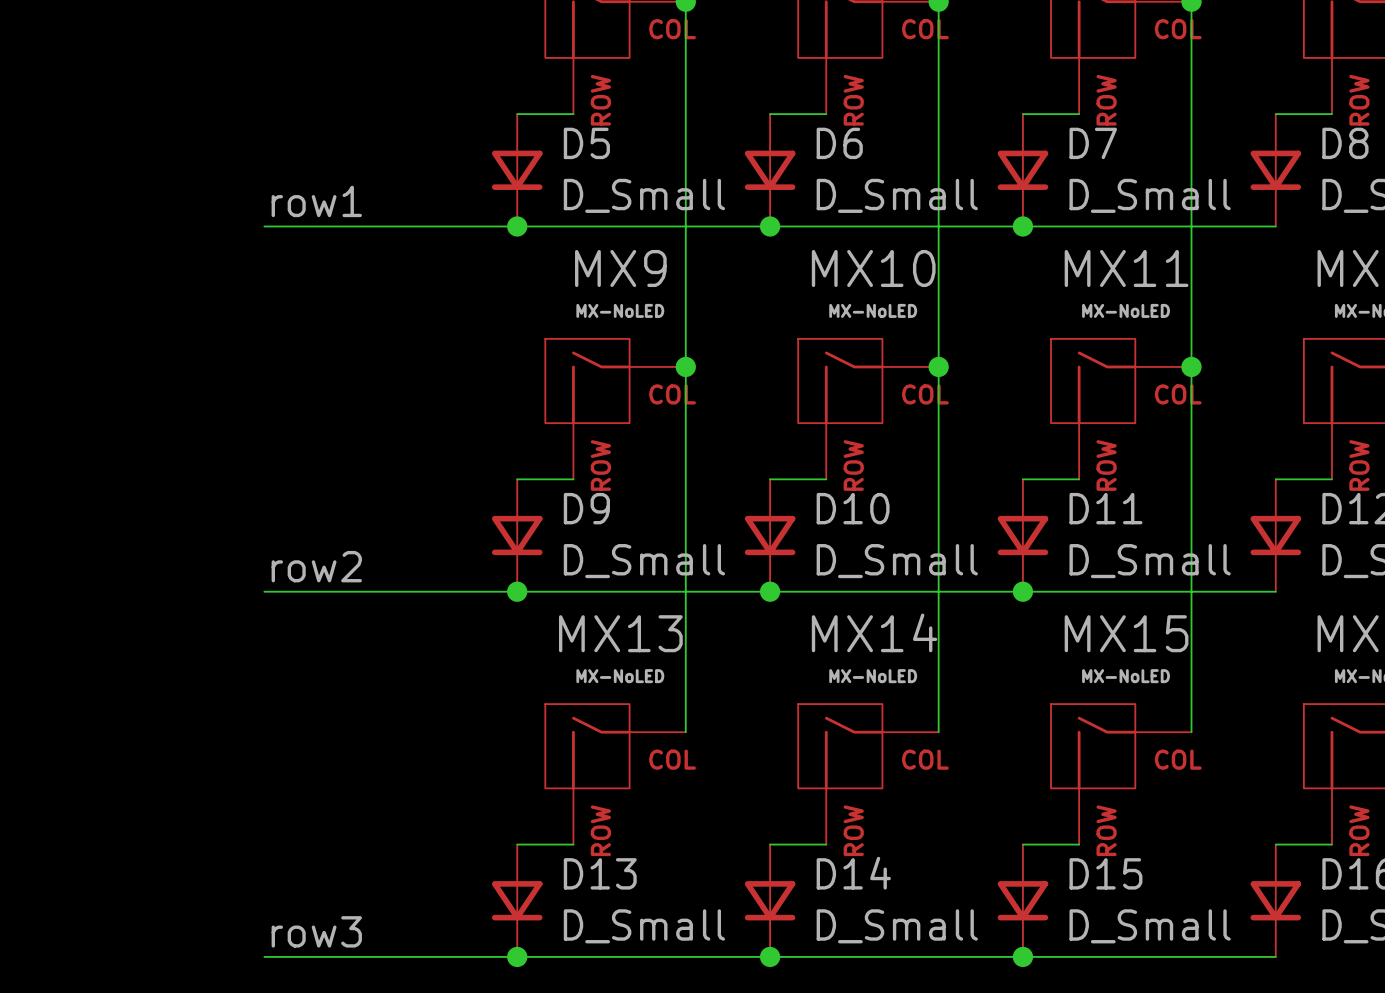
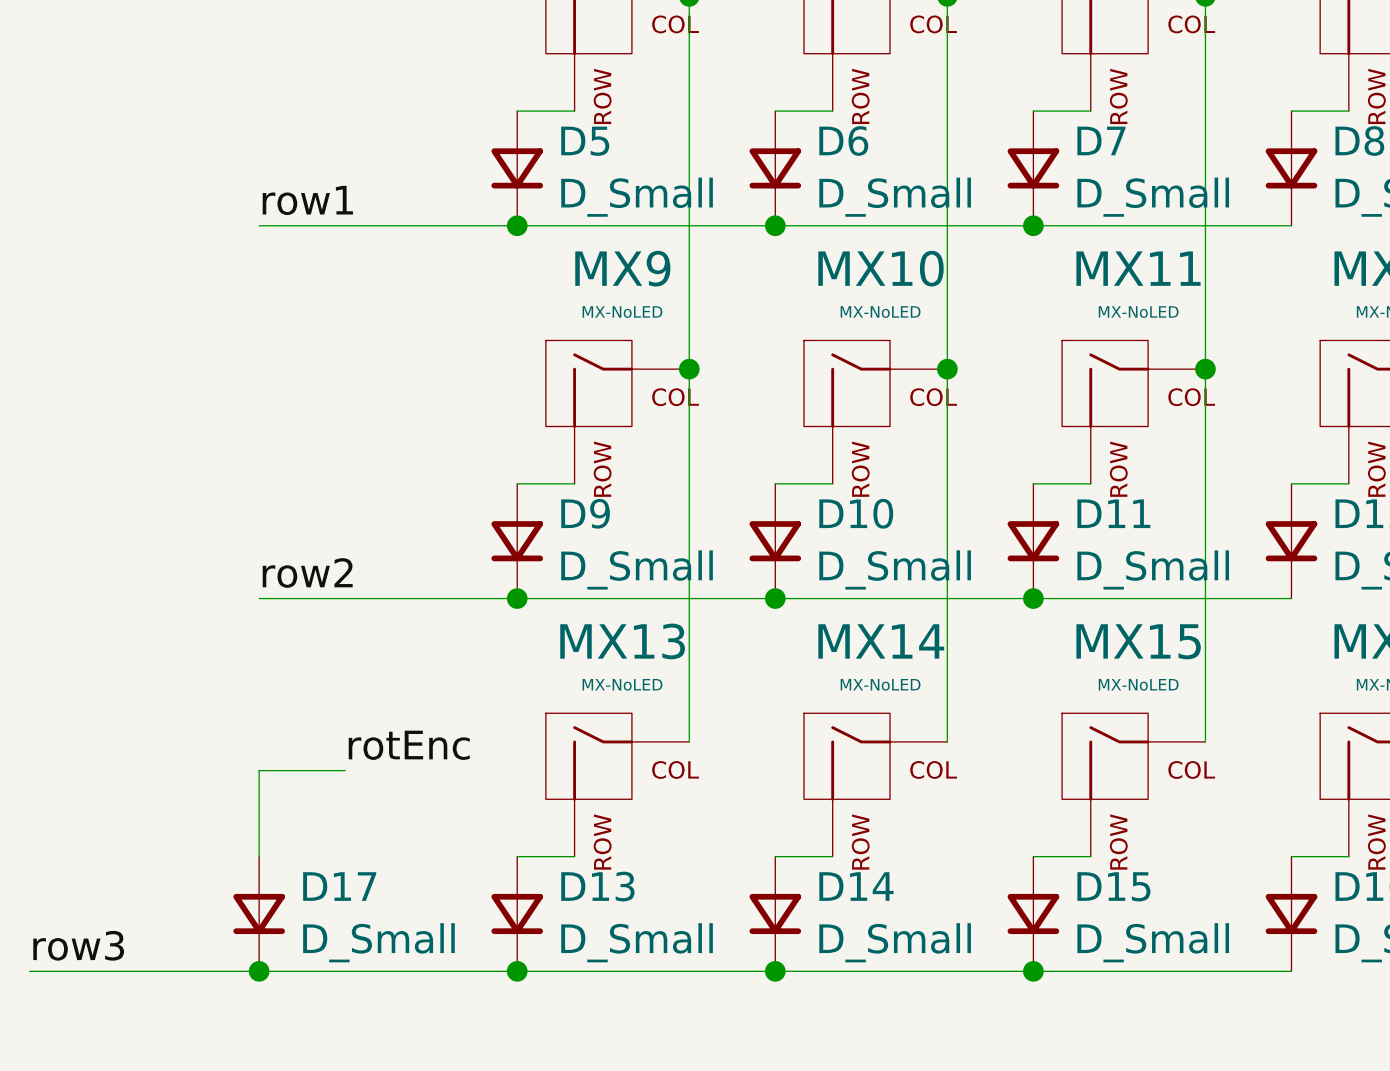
label: none -> rotEnc (409, 745)
wire: none -> (345, 770) (259, 770) (259, 856)
D17: none -> D_Small (259, 913)
label position: row3 (316, 931) -> row3 (78, 945)
wire: none -> (29, 971) (259, 971)
junction: none -> (259, 971)

